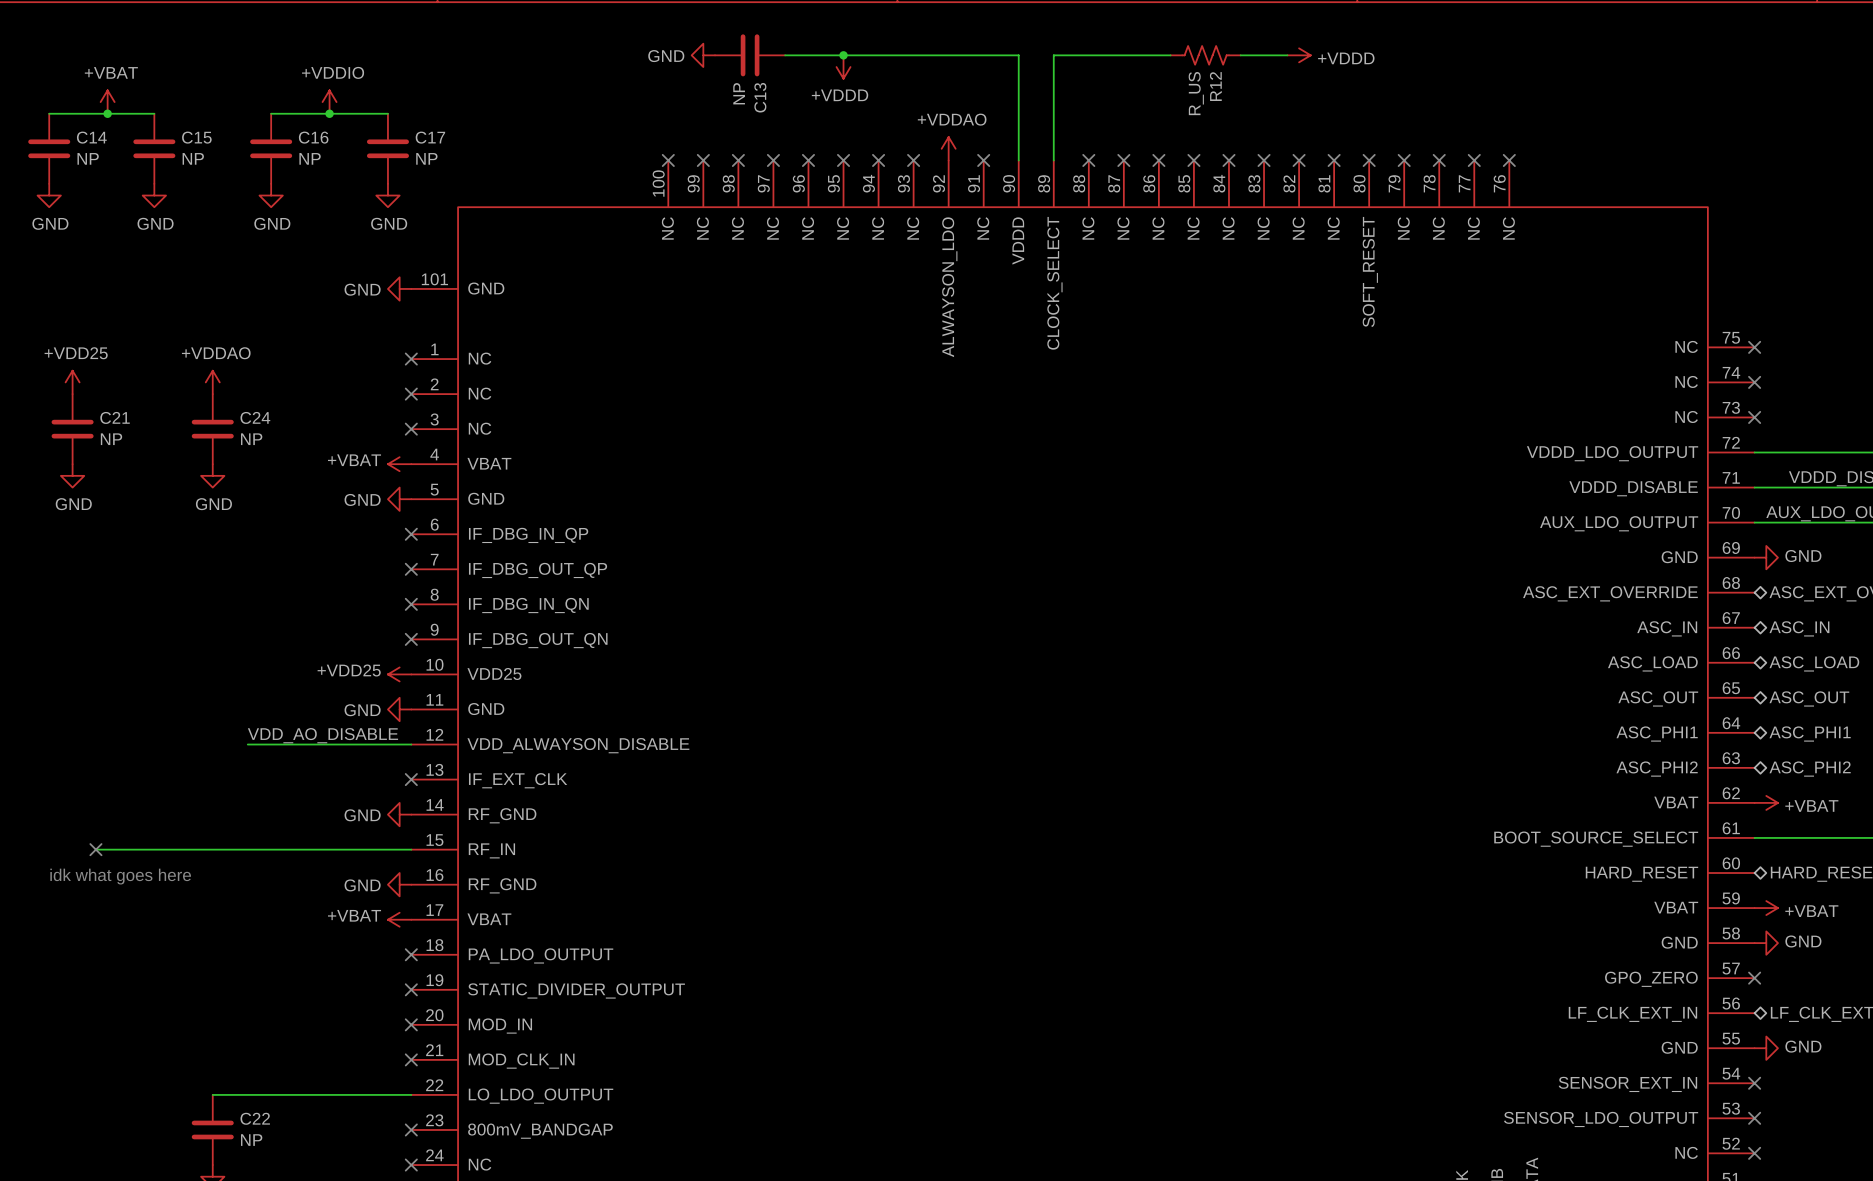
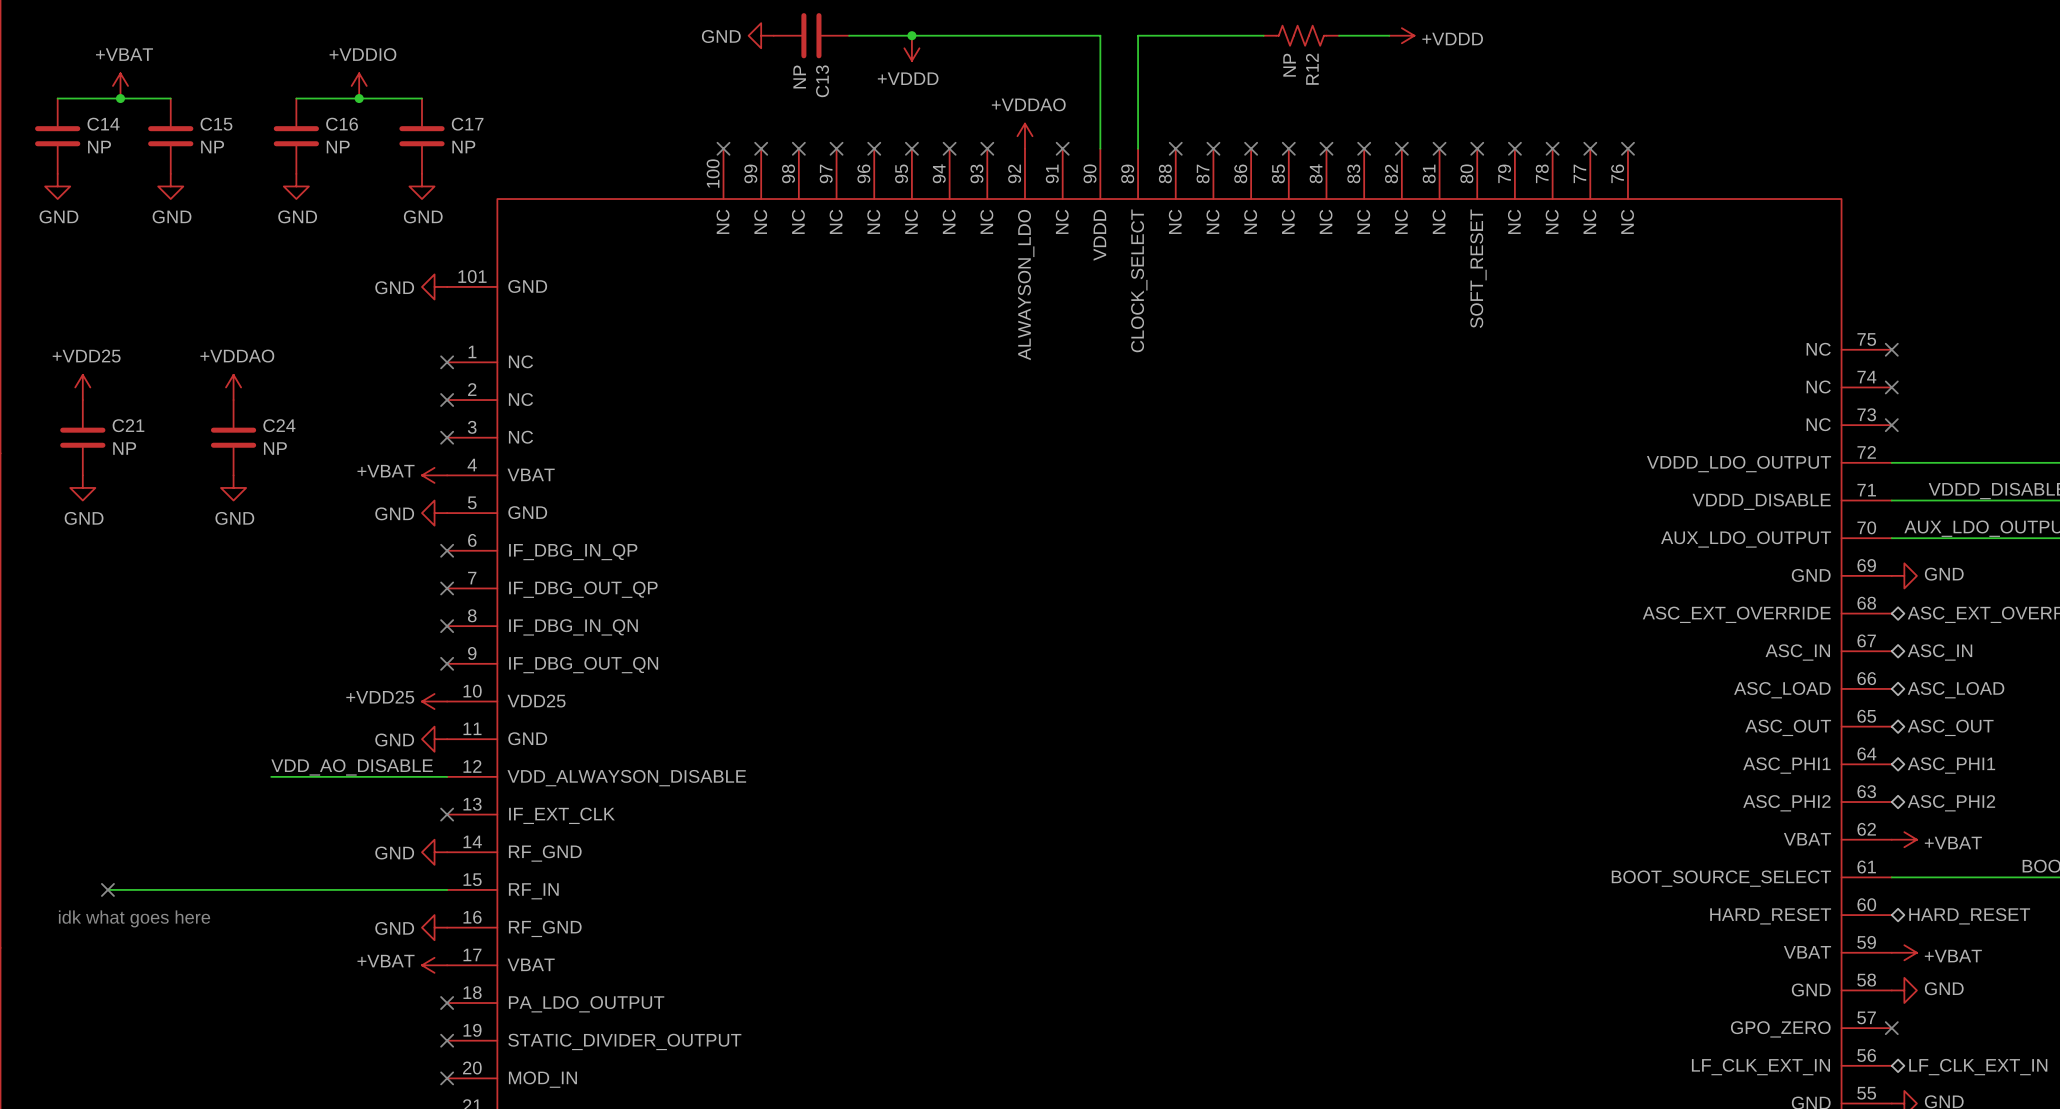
R12 value: R_US (1196, 93) -> NP (1289, 65)

